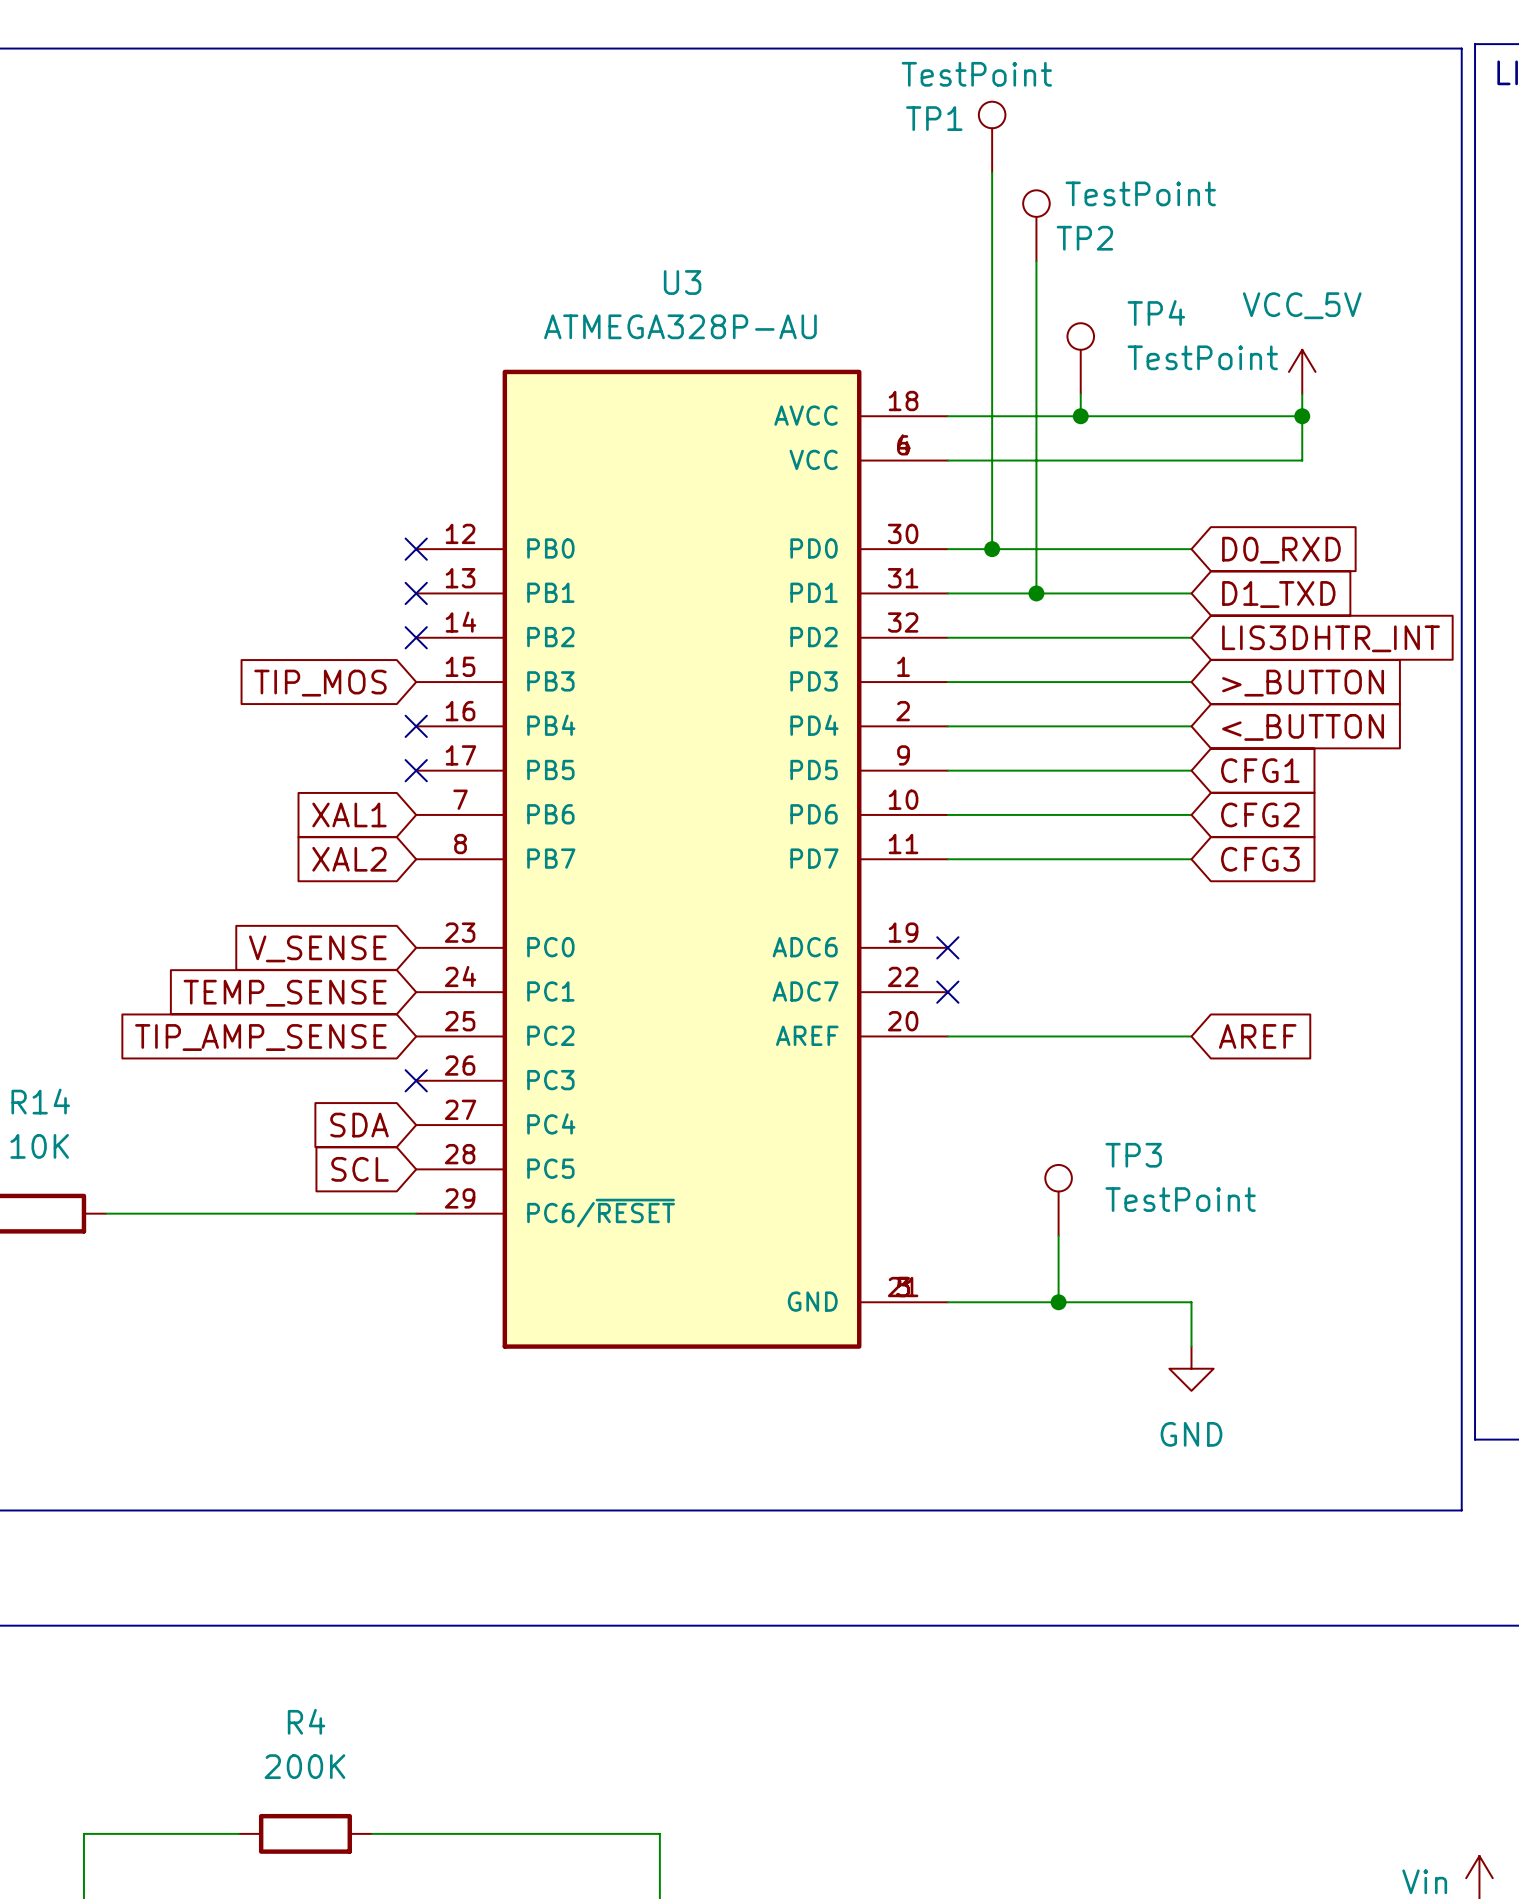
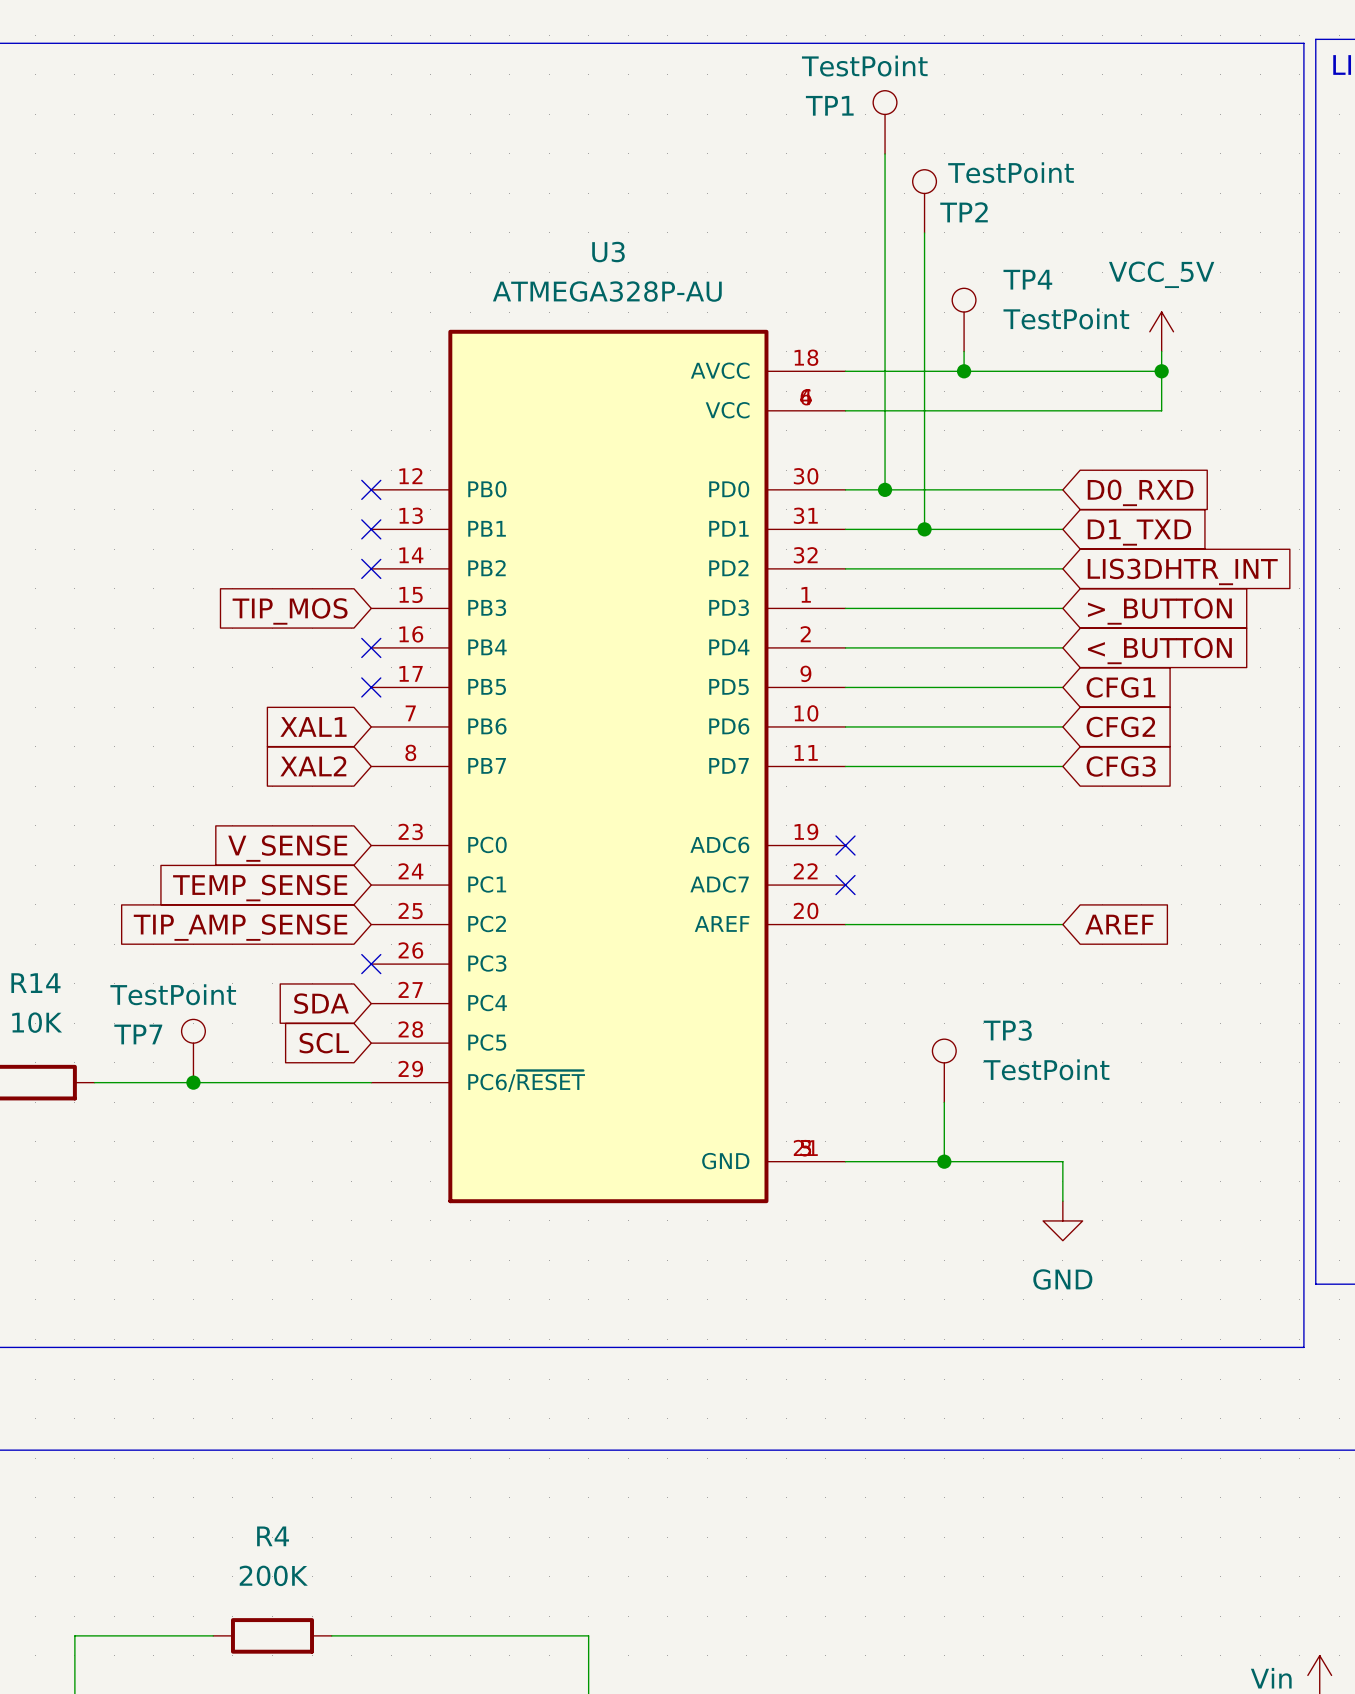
TP7: none -> TestPoint (193, 1051)
junction: none -> (193, 1082)

